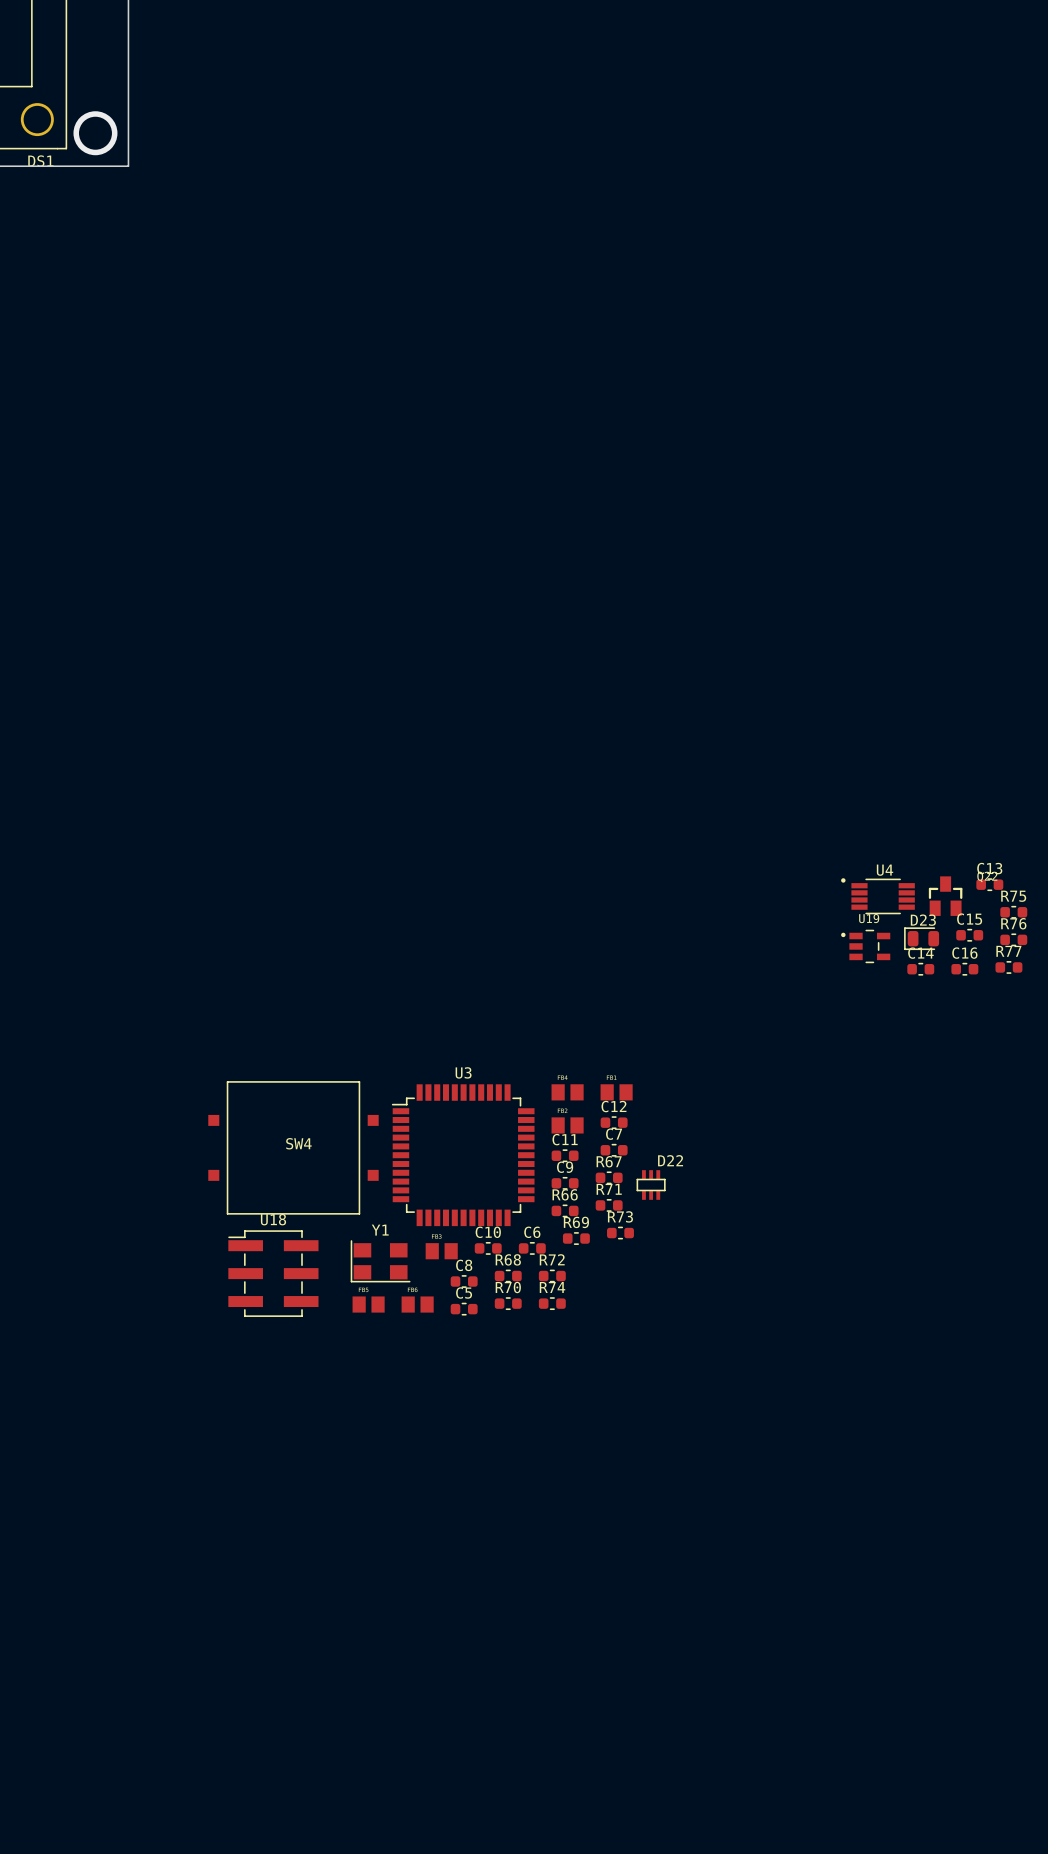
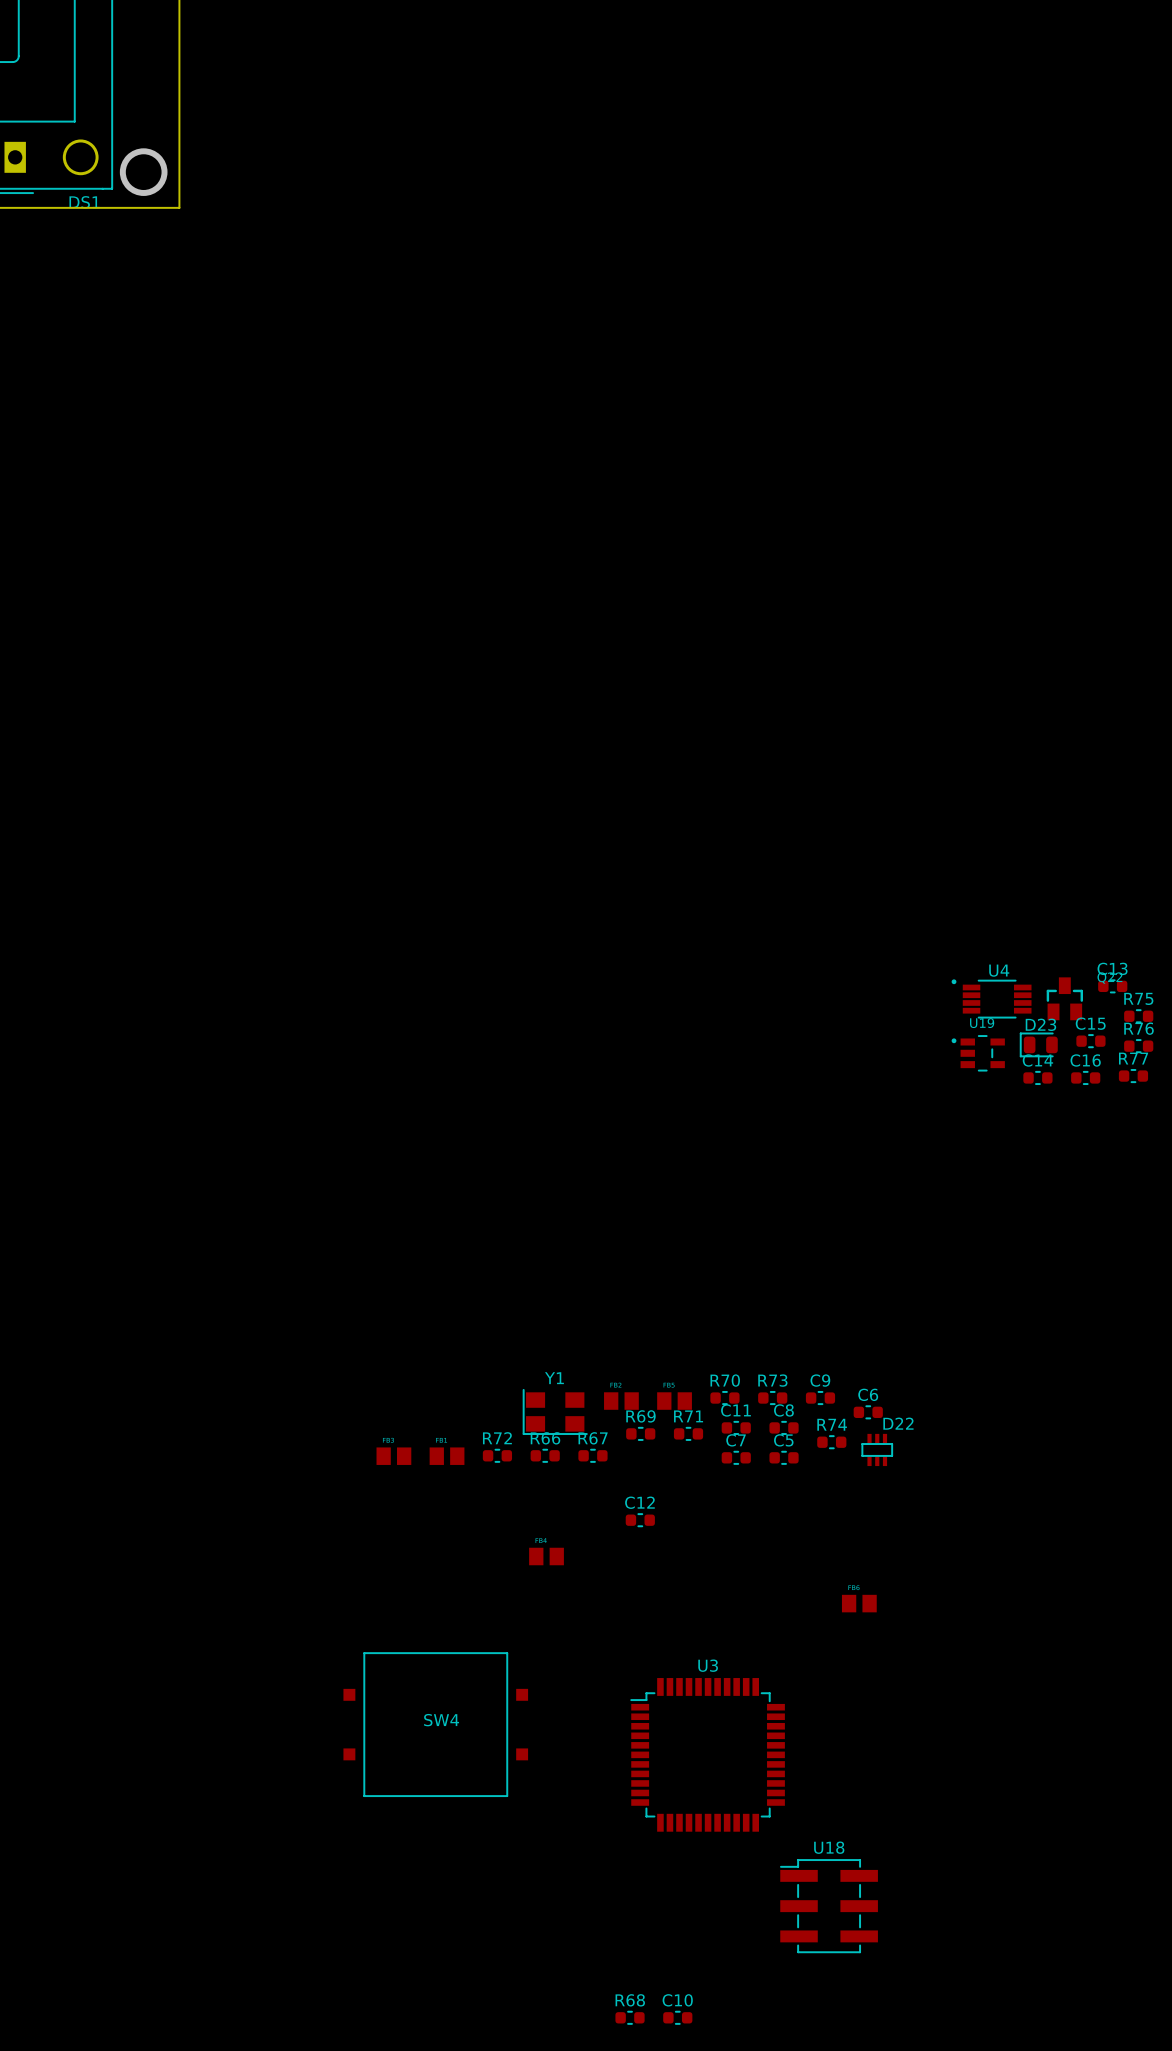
part position: (567, 1092) -> (546, 1556)
part position: (616, 1092) -> (447, 1456)
C12 position: (614, 1122) -> (640, 1520)
part position: (567, 1125) -> (621, 1401)
SW4 position: (293, 1147) -> (435, 1724)
C7 position: (614, 1150) -> (736, 1457)
U3 position: (463, 1155) -> (707, 1754)
C11 position: (565, 1155) -> (736, 1427)
R67 position: (609, 1177) -> (592, 1455)
C9 position: (565, 1183) -> (820, 1398)
D22 position: (651, 1184) -> (877, 1449)
R71 position: (609, 1205) -> (688, 1433)
R66 position: (565, 1210) -> (545, 1455)
R73 position: (620, 1233) -> (772, 1398)
R69 position: (576, 1238) -> (640, 1433)
C10 position: (488, 1248) -> (677, 2017)
C6 position: (532, 1248) -> (868, 1412)
part position: (441, 1251) -> (393, 1456)
Y1 position: (380, 1261) -> (555, 1411)
U18 position: (273, 1273) -> (829, 1906)
R68 position: (508, 1276) -> (630, 2017)
R72 position: (552, 1276) -> (497, 1455)
C8 position: (464, 1281) -> (784, 1427)
R70 position: (508, 1303) -> (724, 1398)
R74 position: (552, 1303) -> (831, 1442)
part position: (368, 1304) -> (674, 1401)
part position: (417, 1304) -> (859, 1603)
C5 position: (464, 1309) -> (784, 1457)

